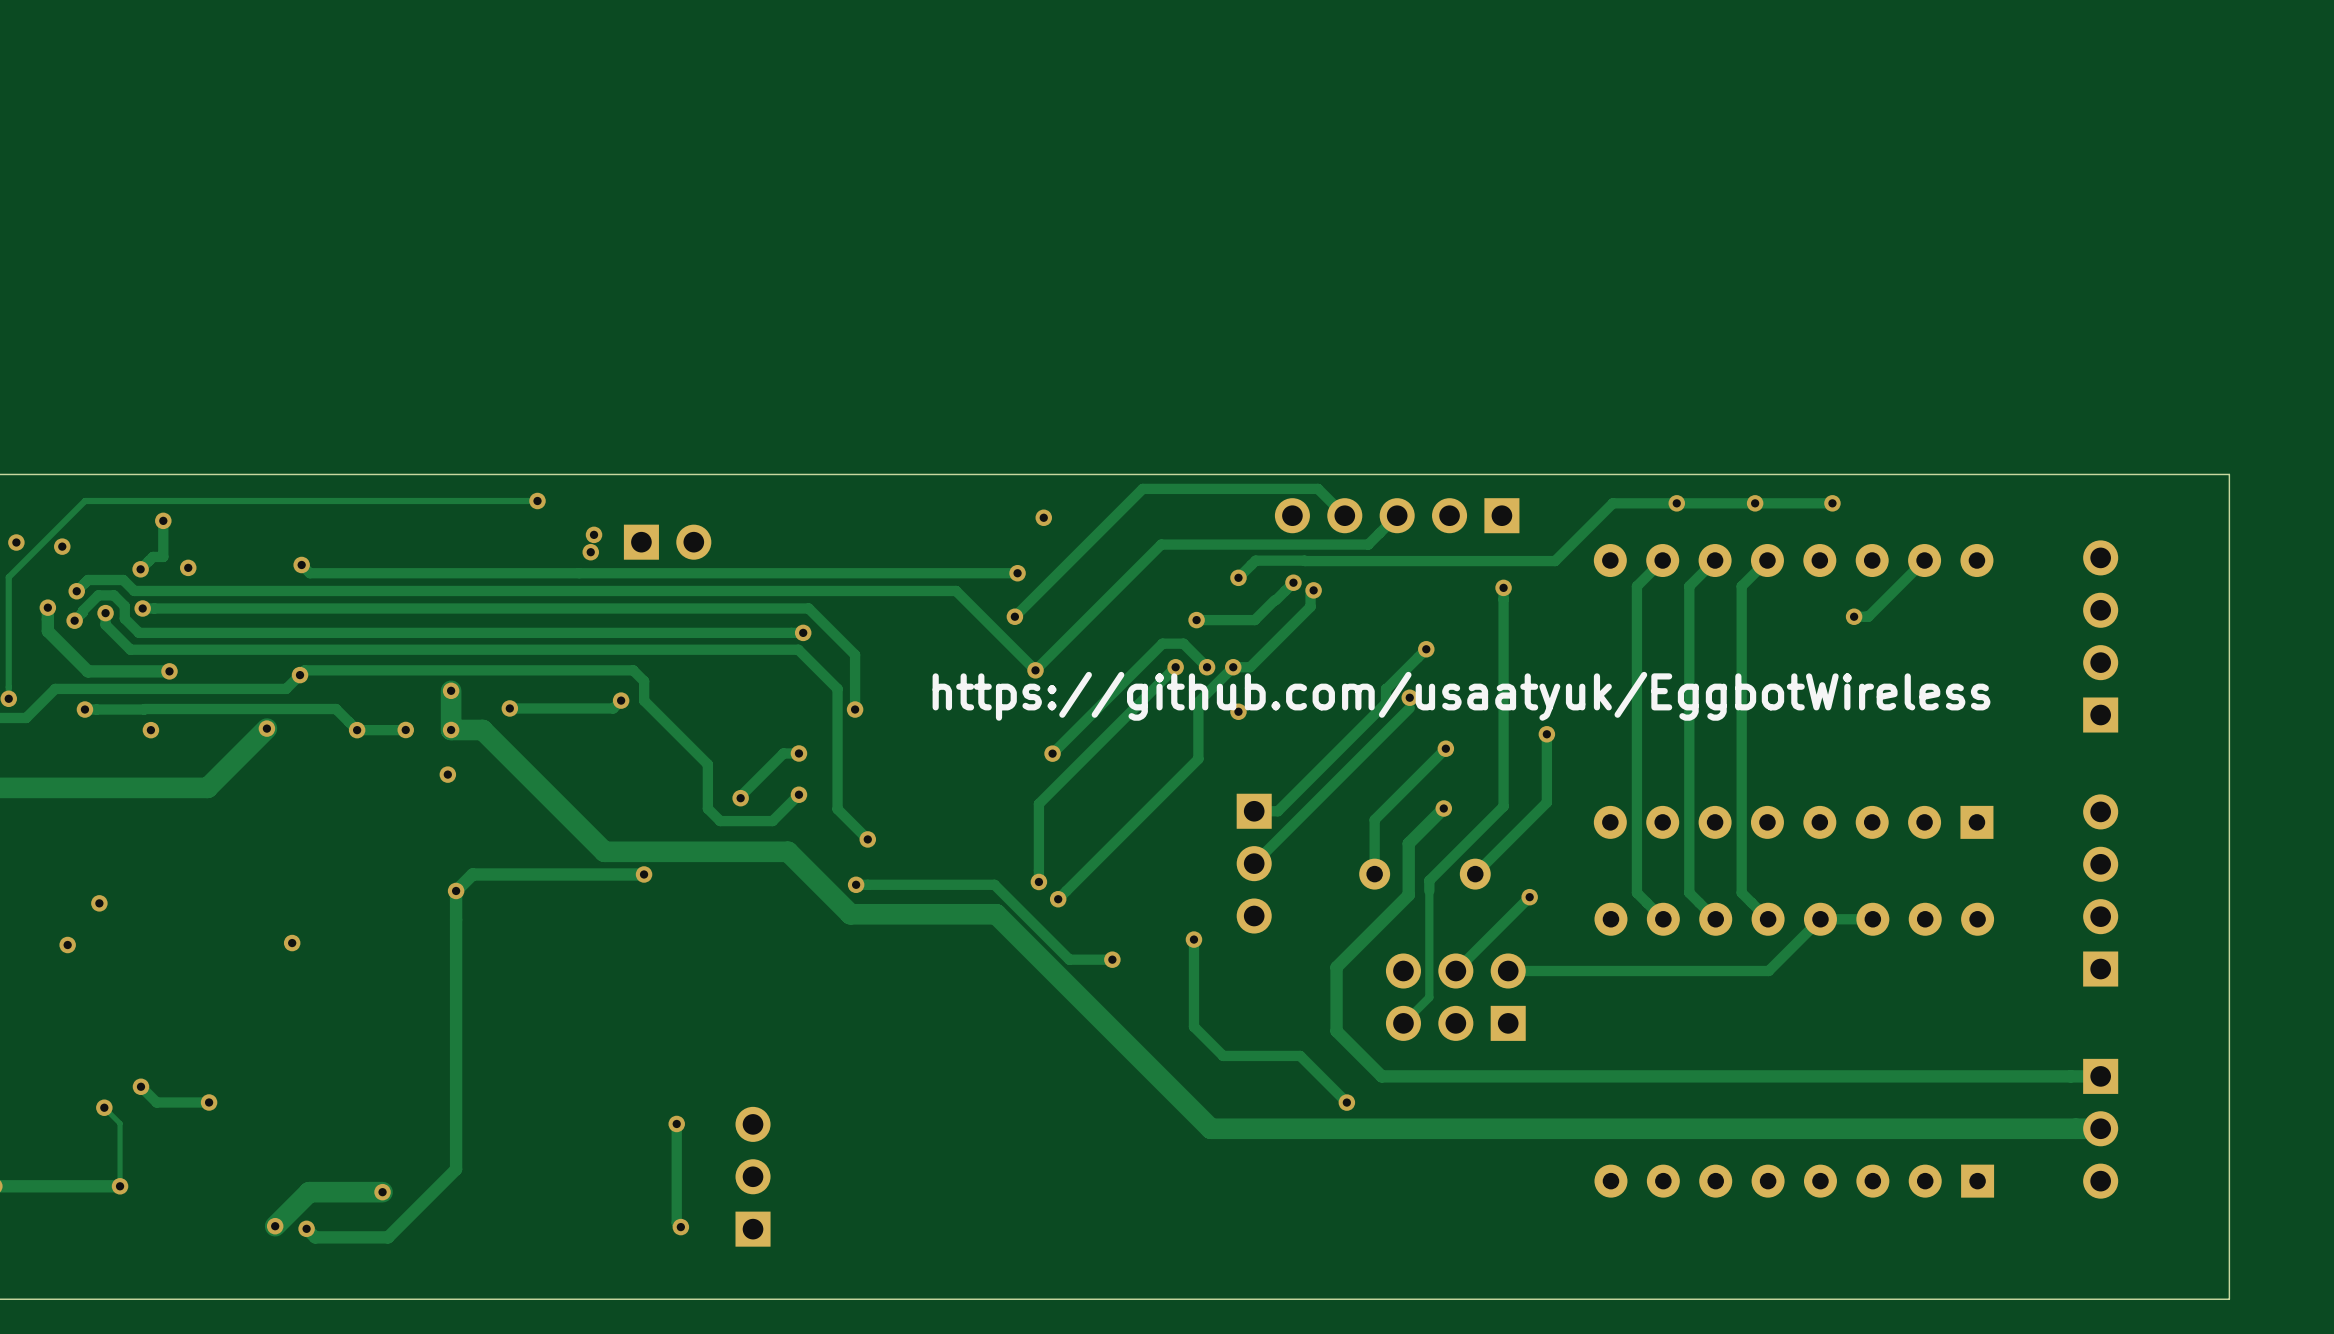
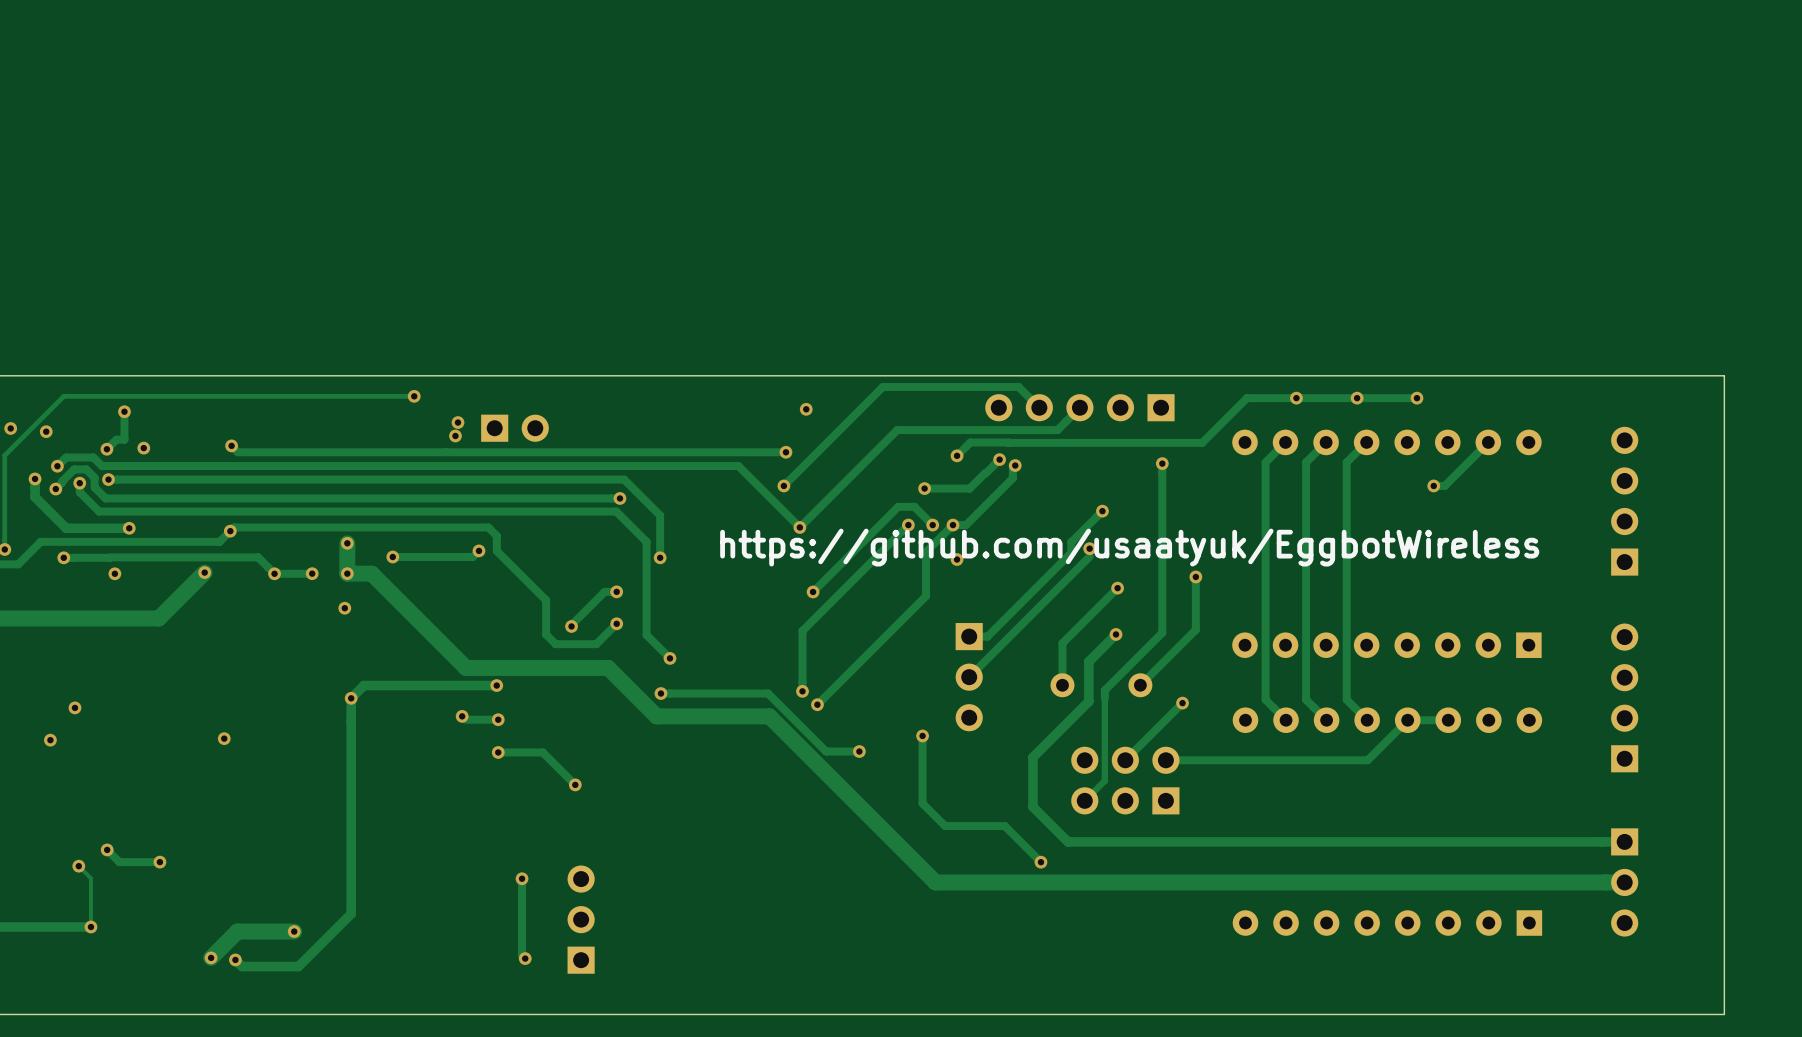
track: none -> (462, 716) (465, 719) (498, 719)
via: none -> (462, 716)
via: none -> (498, 719)
track: none -> (498, 752) (542, 752) (575, 784)
via: none -> (498, 752)
via: none -> (575, 784)

